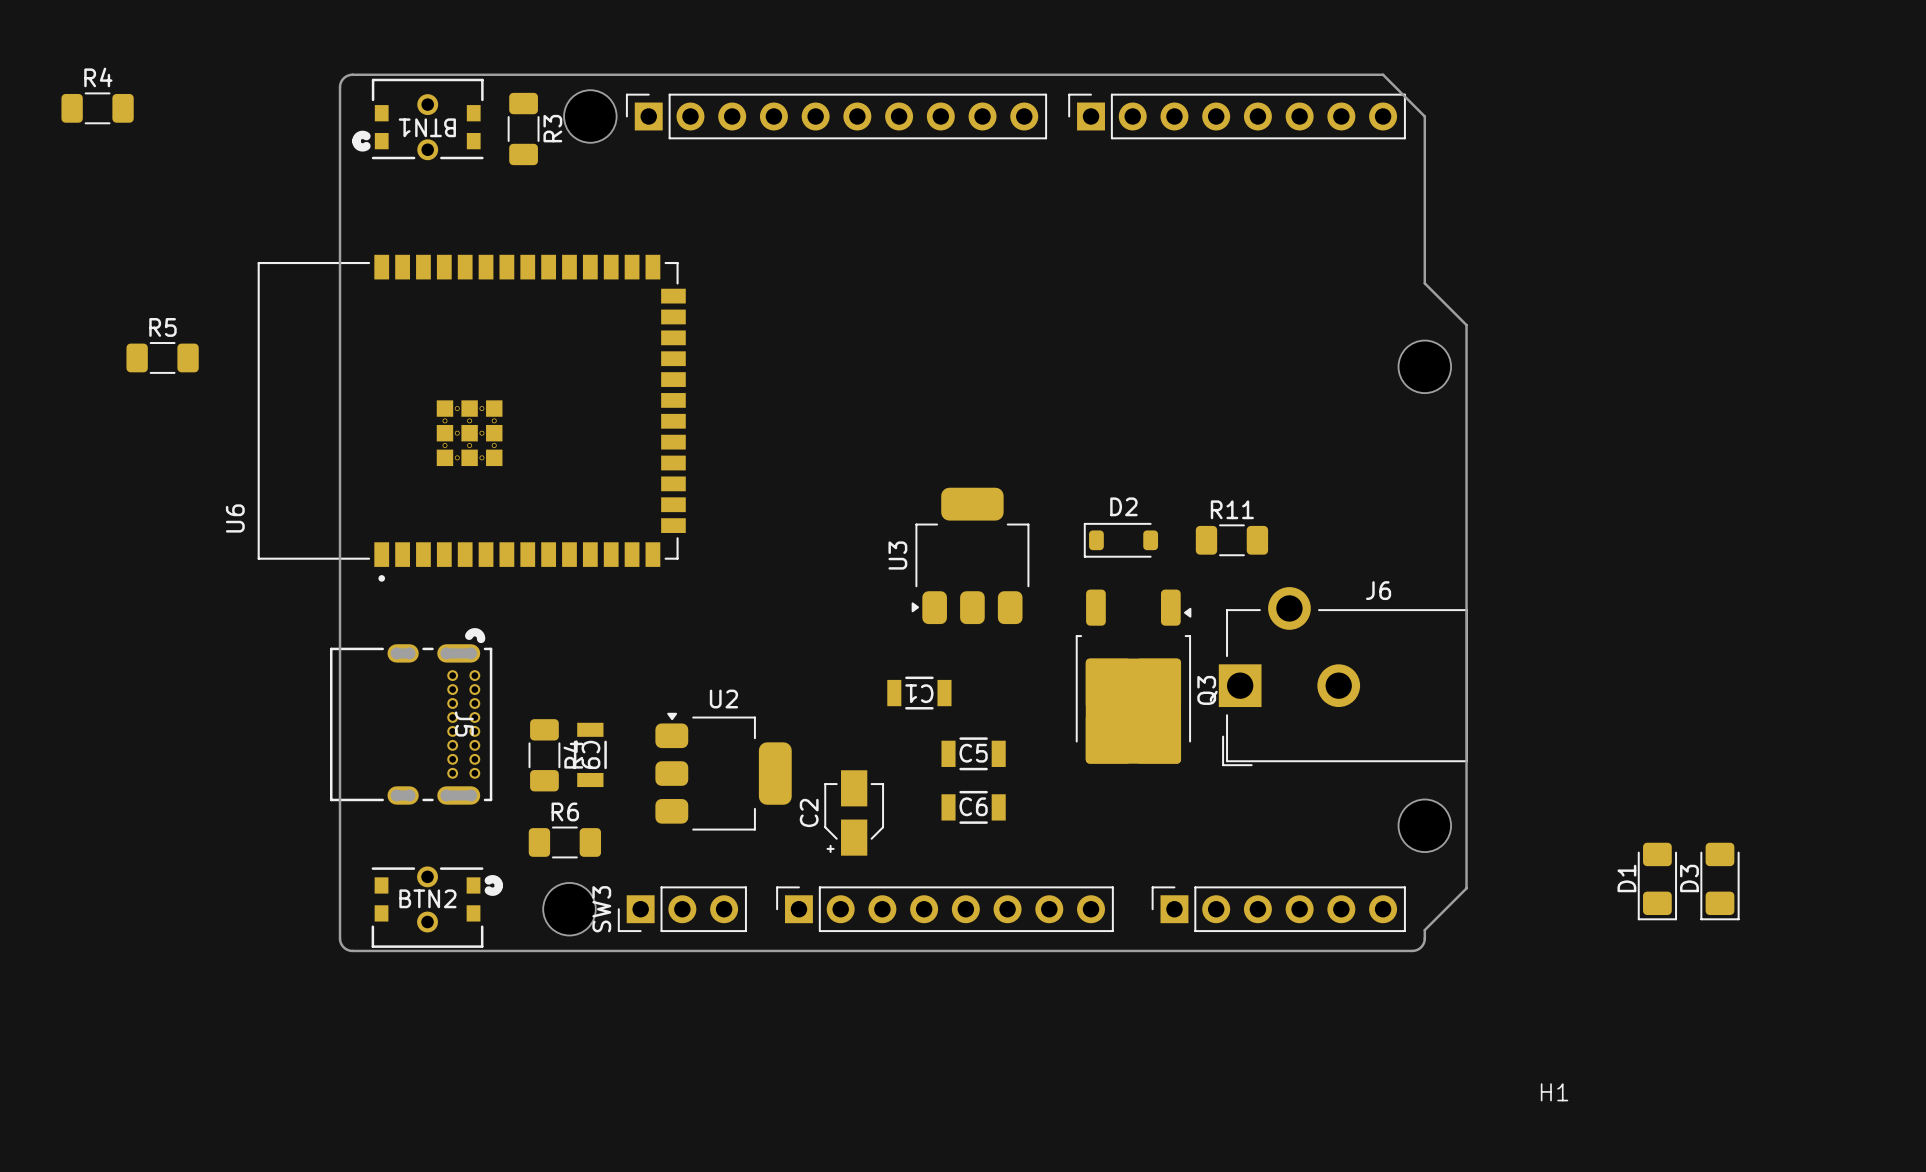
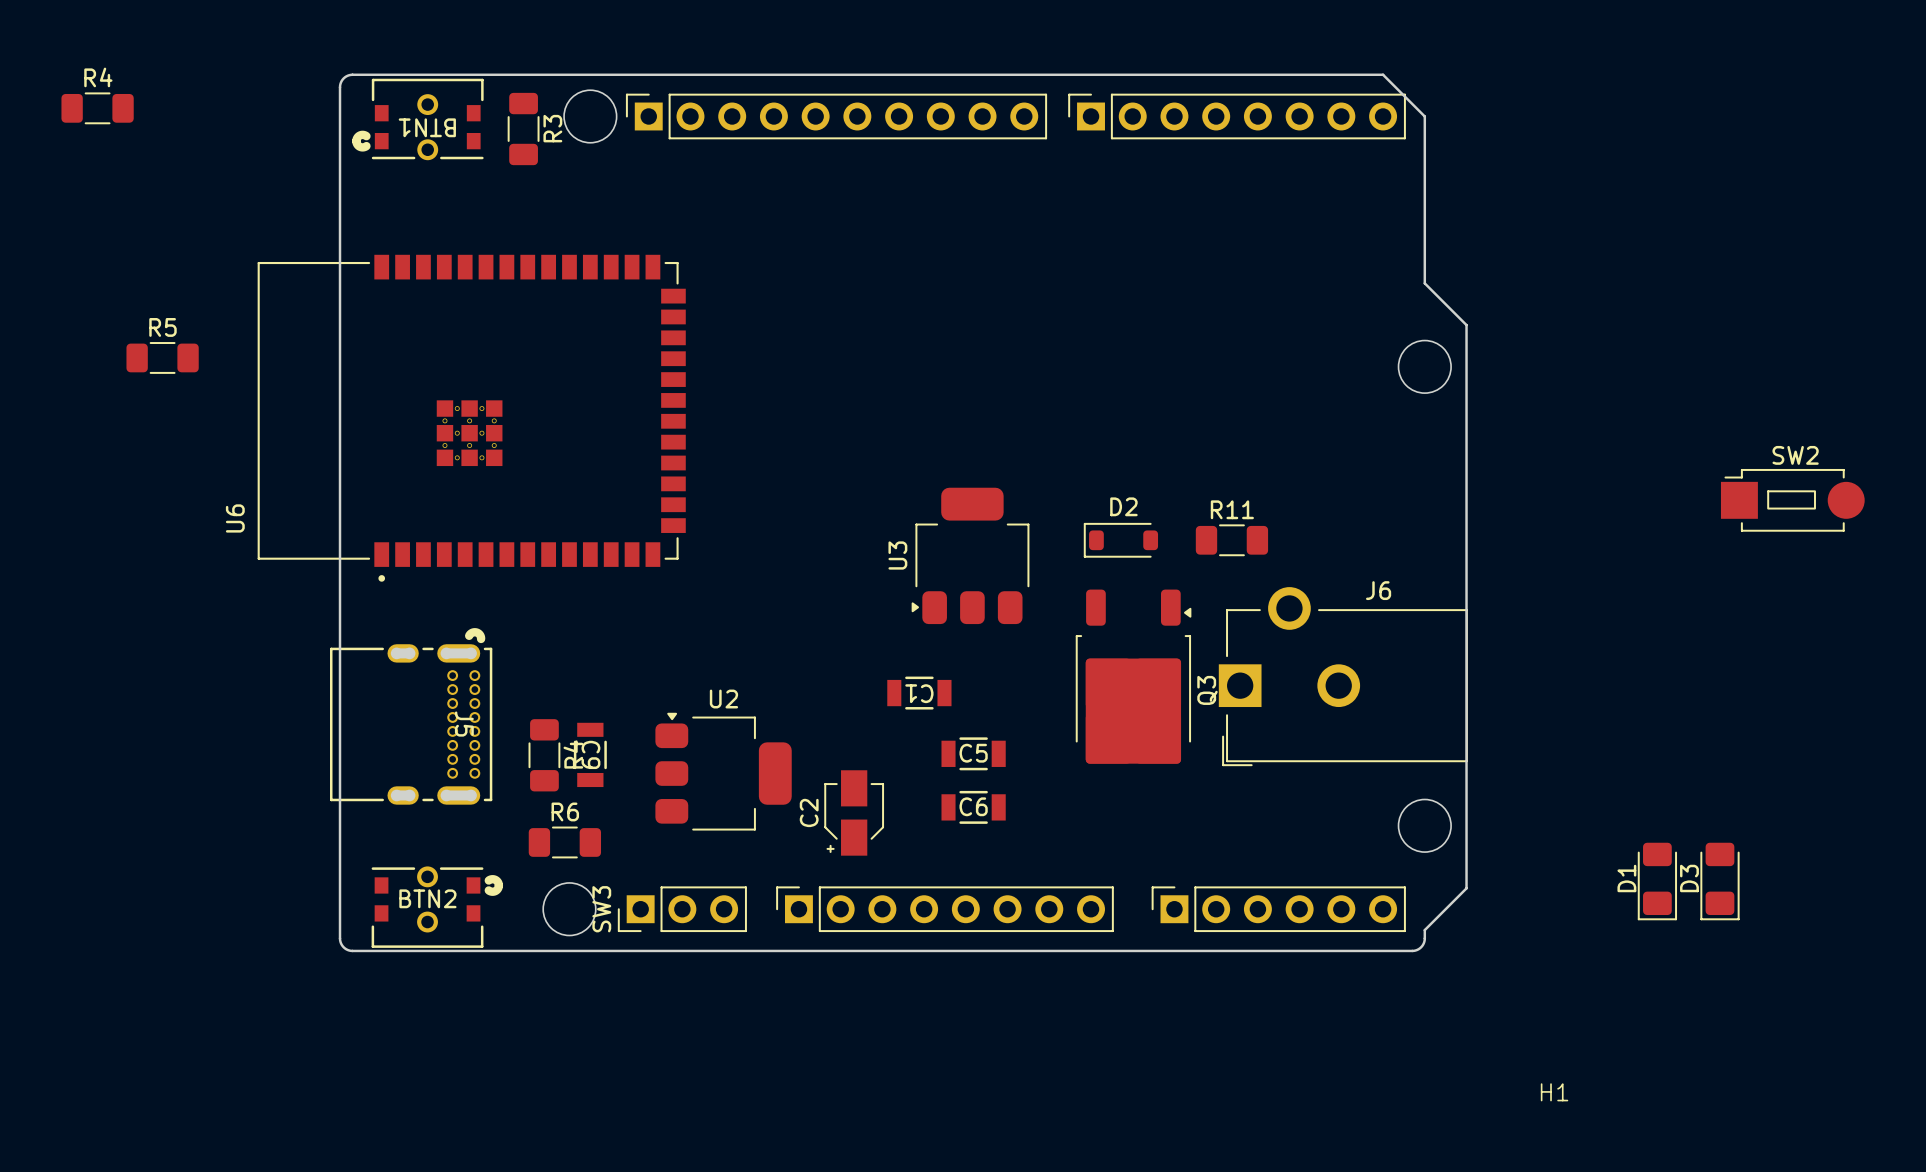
SW2: none -> (1792, 500)

